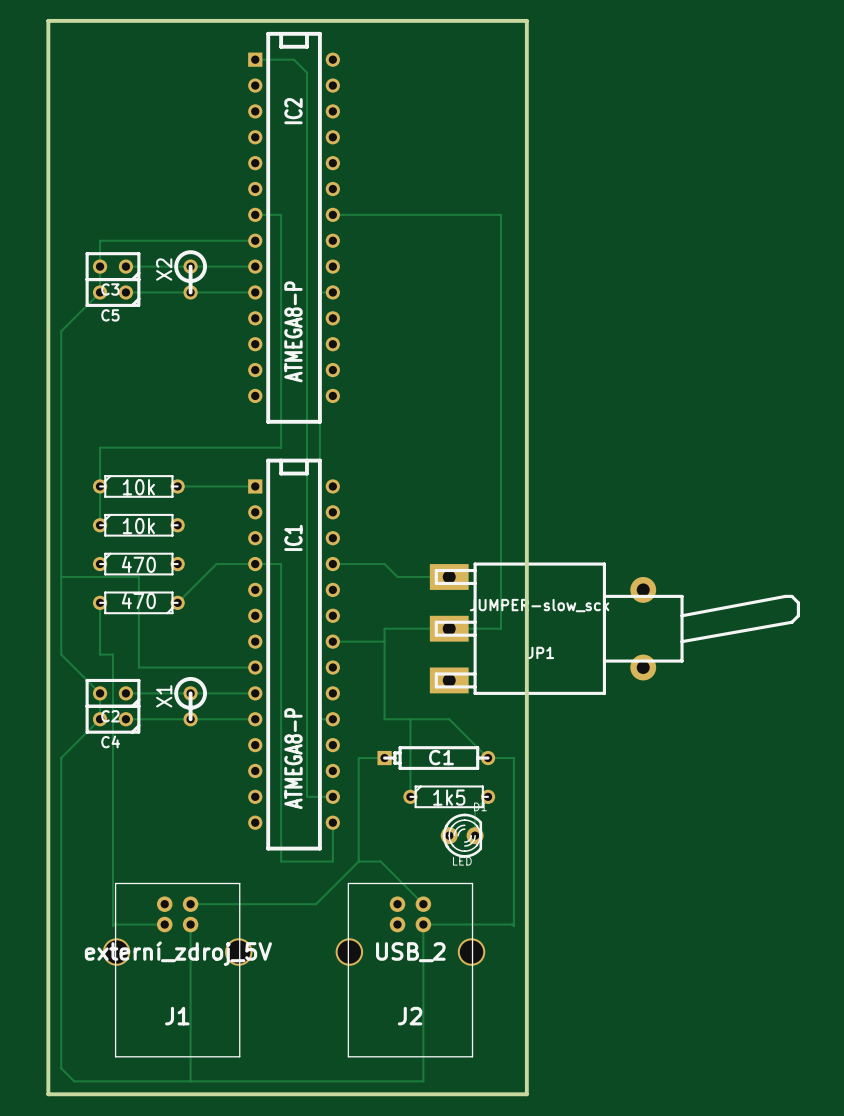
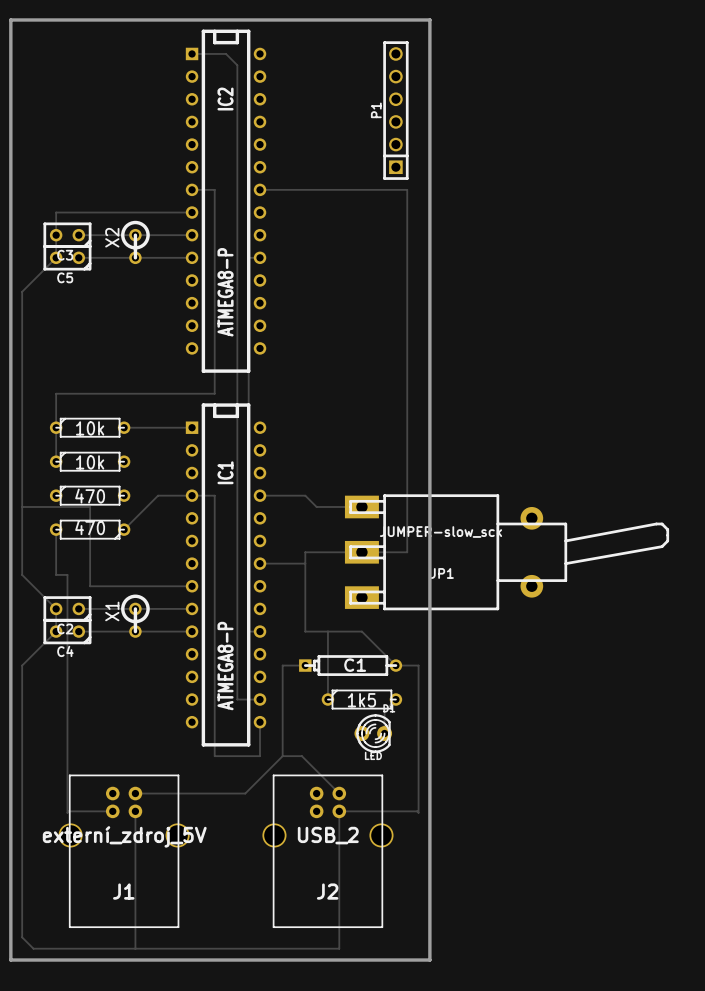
P1: none -> (395, 110)

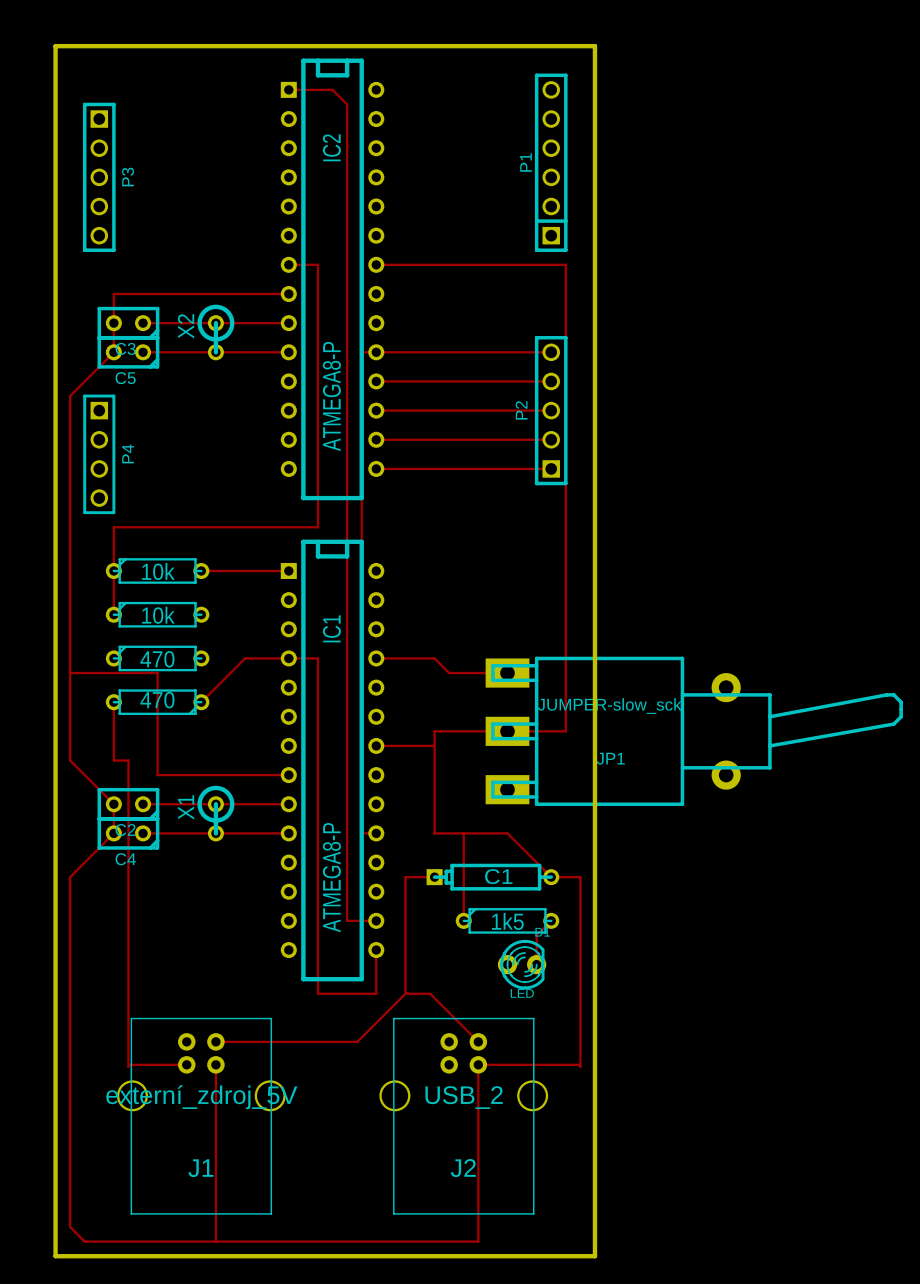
P3: none -> (99, 177)
track: none -> (376, 352) (551, 352)
track: none -> (376, 381) (551, 381)
track: none -> (376, 410) (551, 410)
P2: none -> (551, 410)
track: none -> (376, 439) (551, 439)
P4: none -> (99, 454)
track: none -> (376, 468) (551, 468)

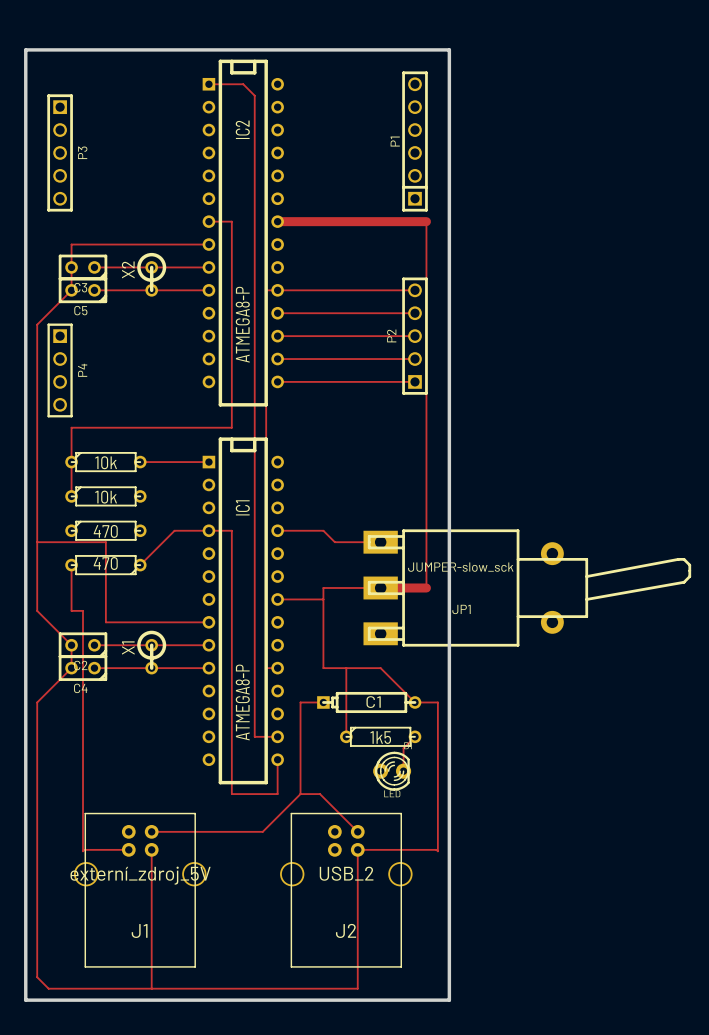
track width: thin (376, 264) (565, 264) -> thick (277, 221) (426, 221)
track width: thin (507, 731) (565, 731) -> thick (380, 587) (426, 587)

